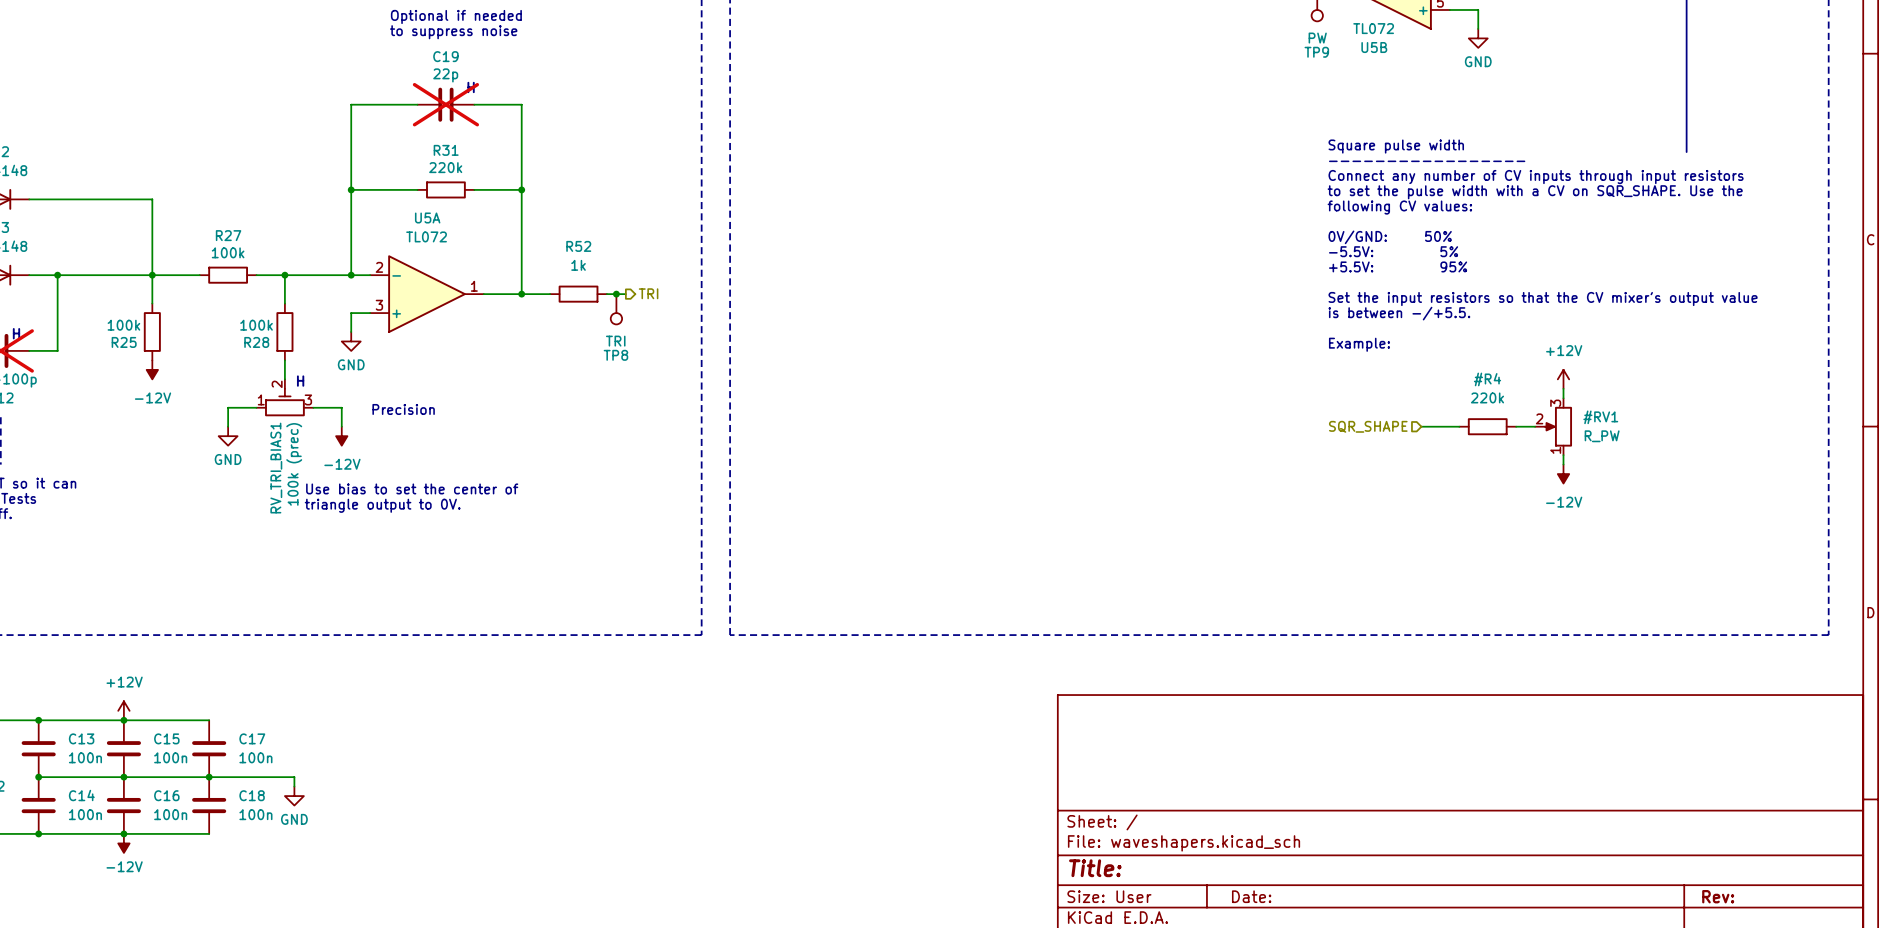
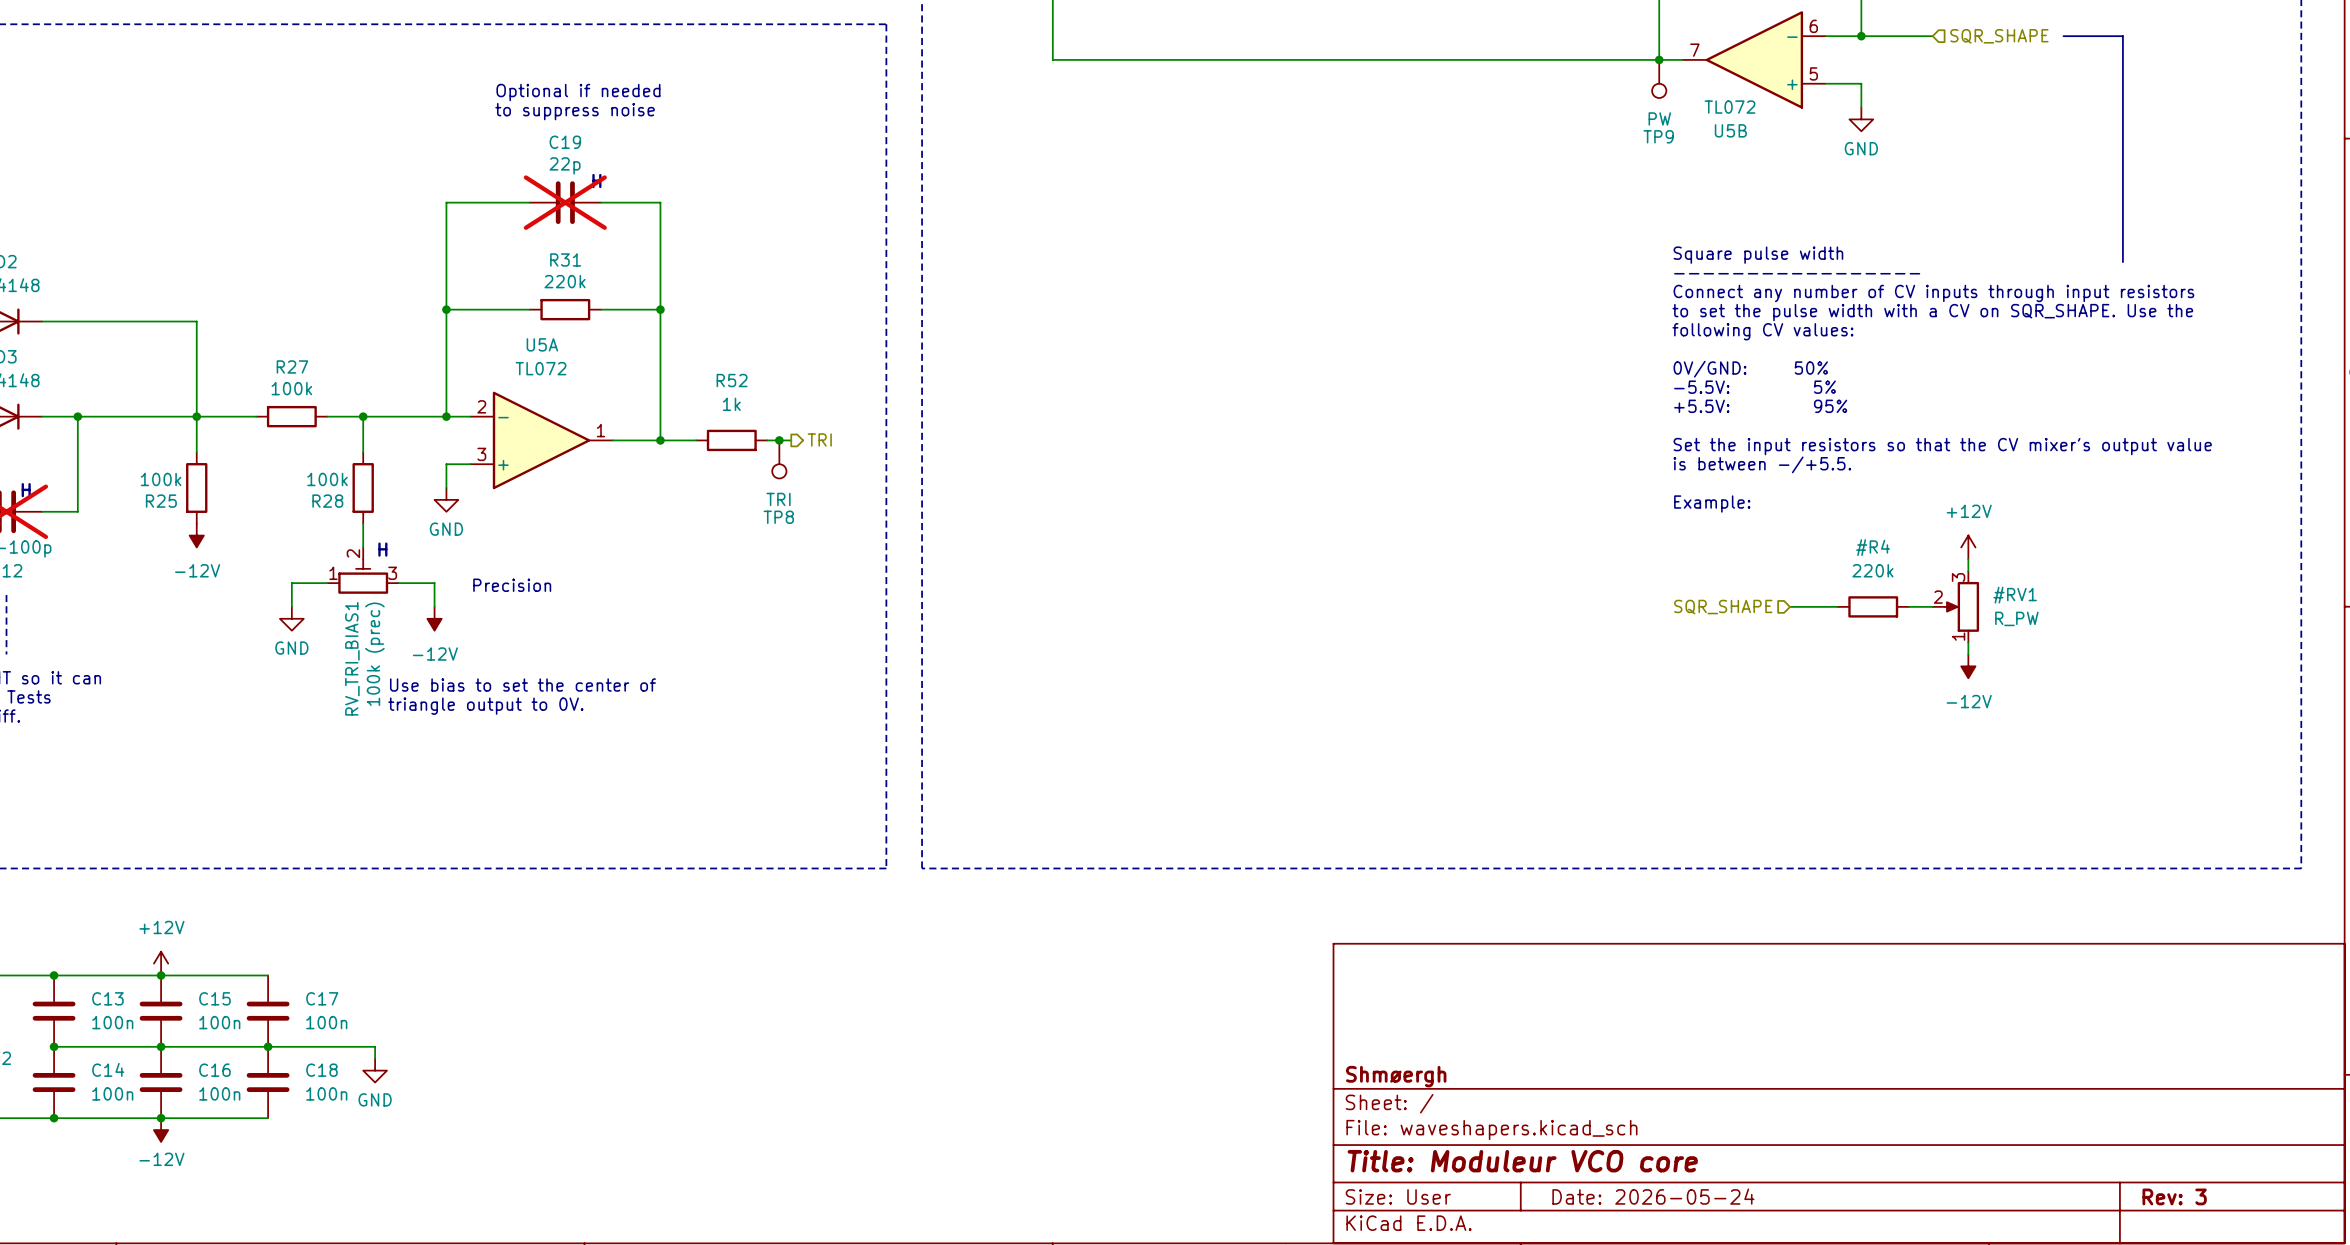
title block: none -> Shmøergh (1396, 1076)
title block: Title: (1095, 868) -> Title: Moduleur VCO core (1522, 1161)
title block: Date: (1251, 896) -> Date: 2026-05-24 (1653, 1196)
title block: Rev: (1718, 896) -> Rev: 3 (2174, 1196)

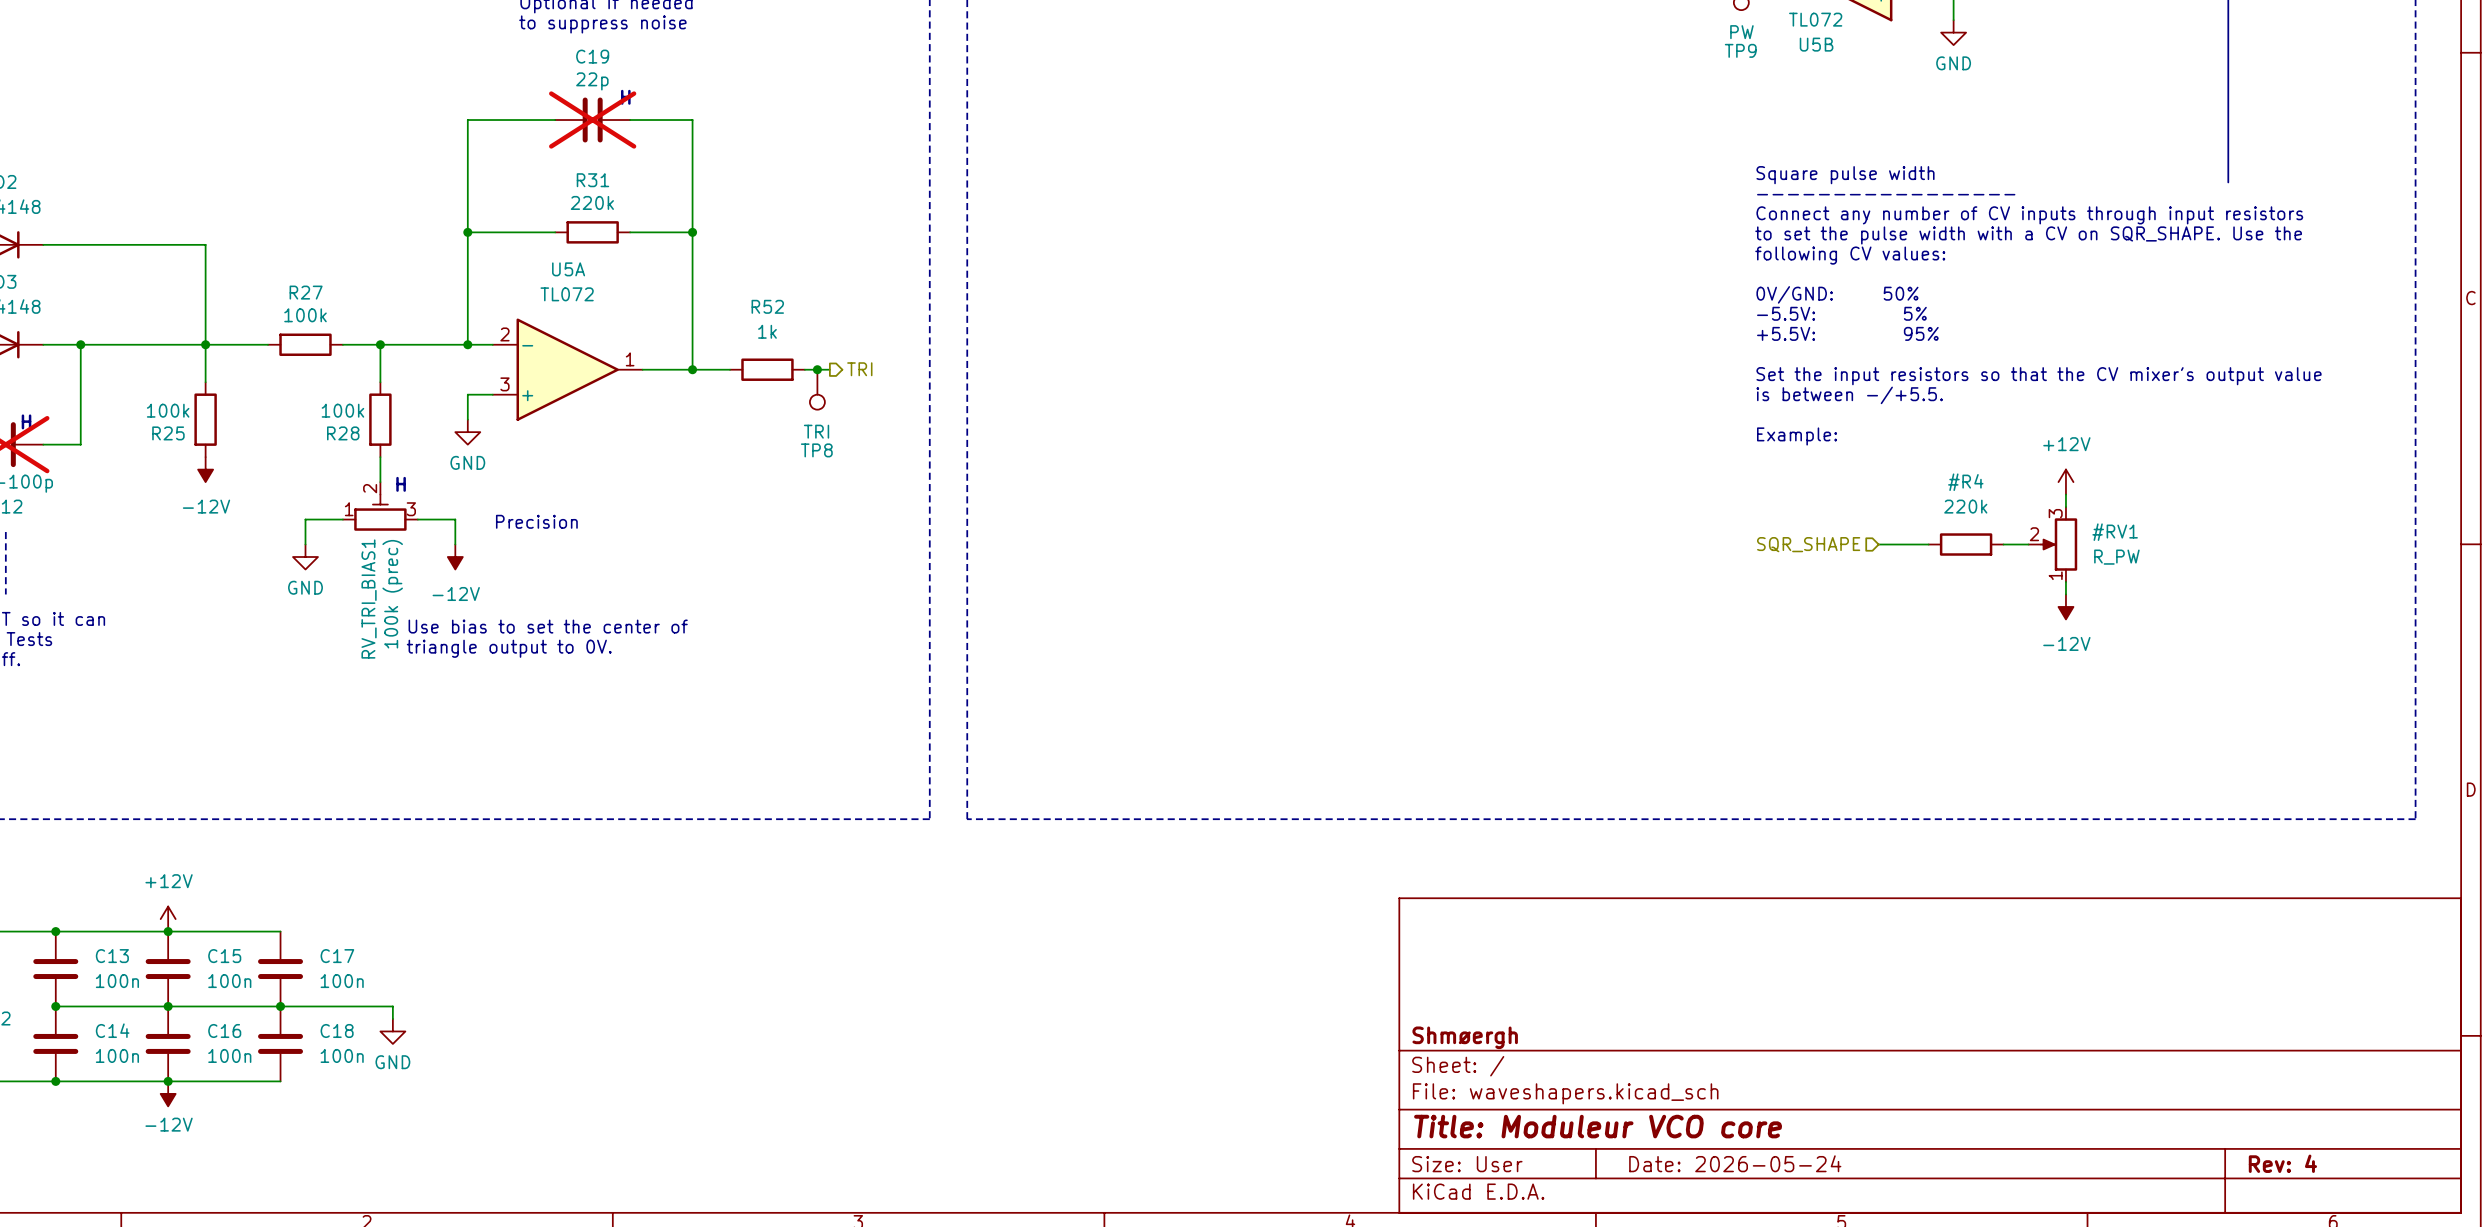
title block: Rev: 3 (2174, 1196) -> Rev: 4 (2282, 1163)

